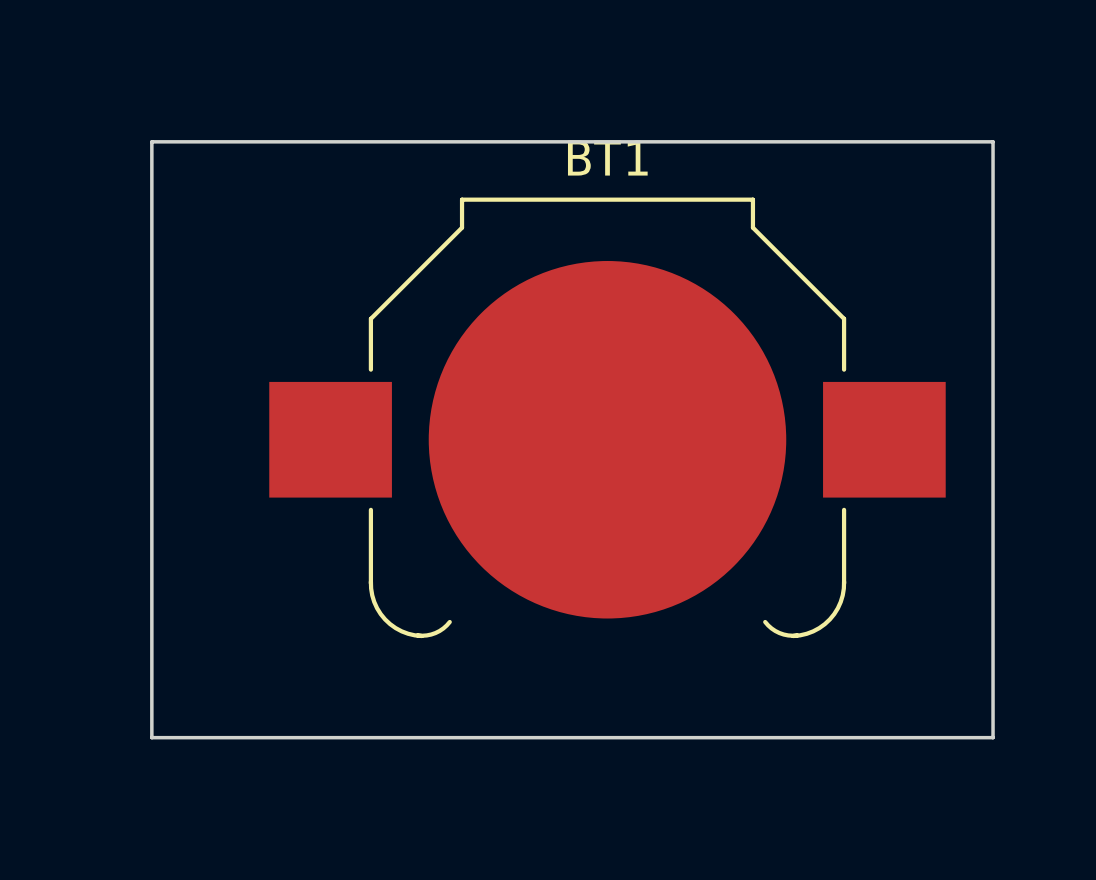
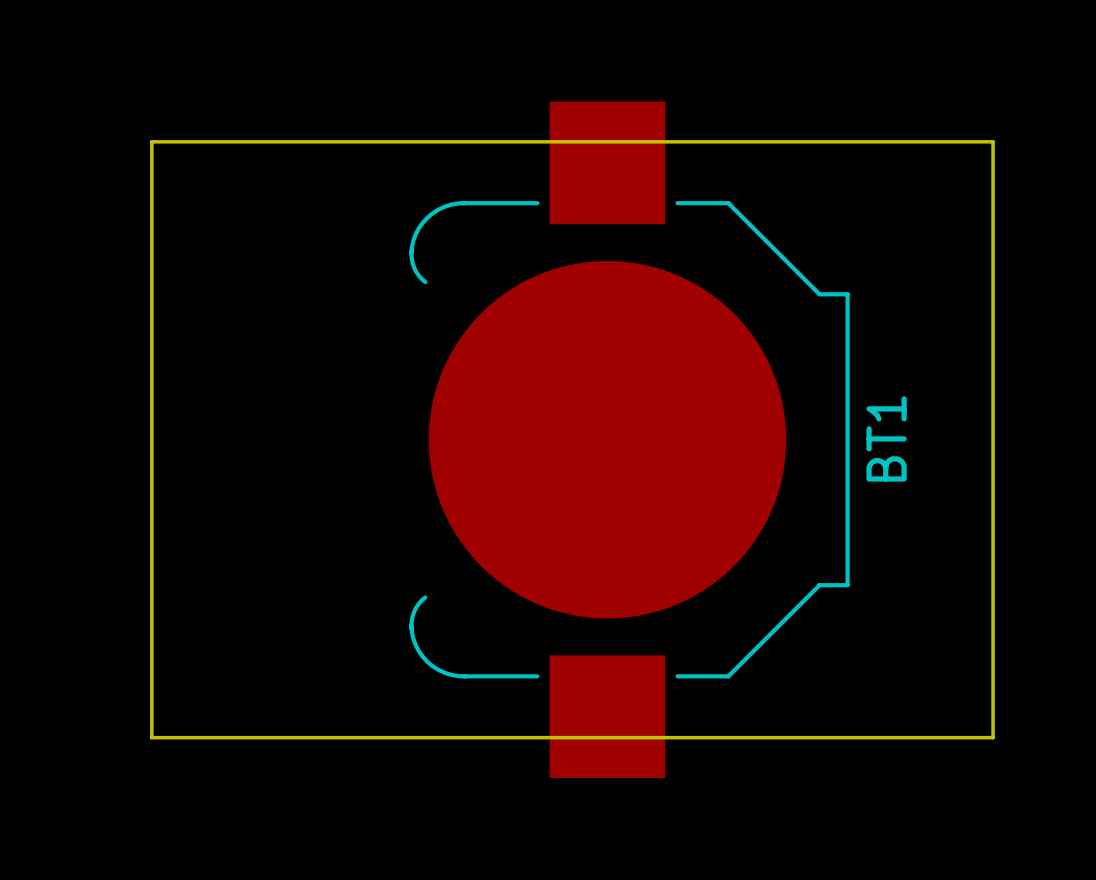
BT1 rotation: 0° (607, 417) -> 90° clockwise (629, 439)

